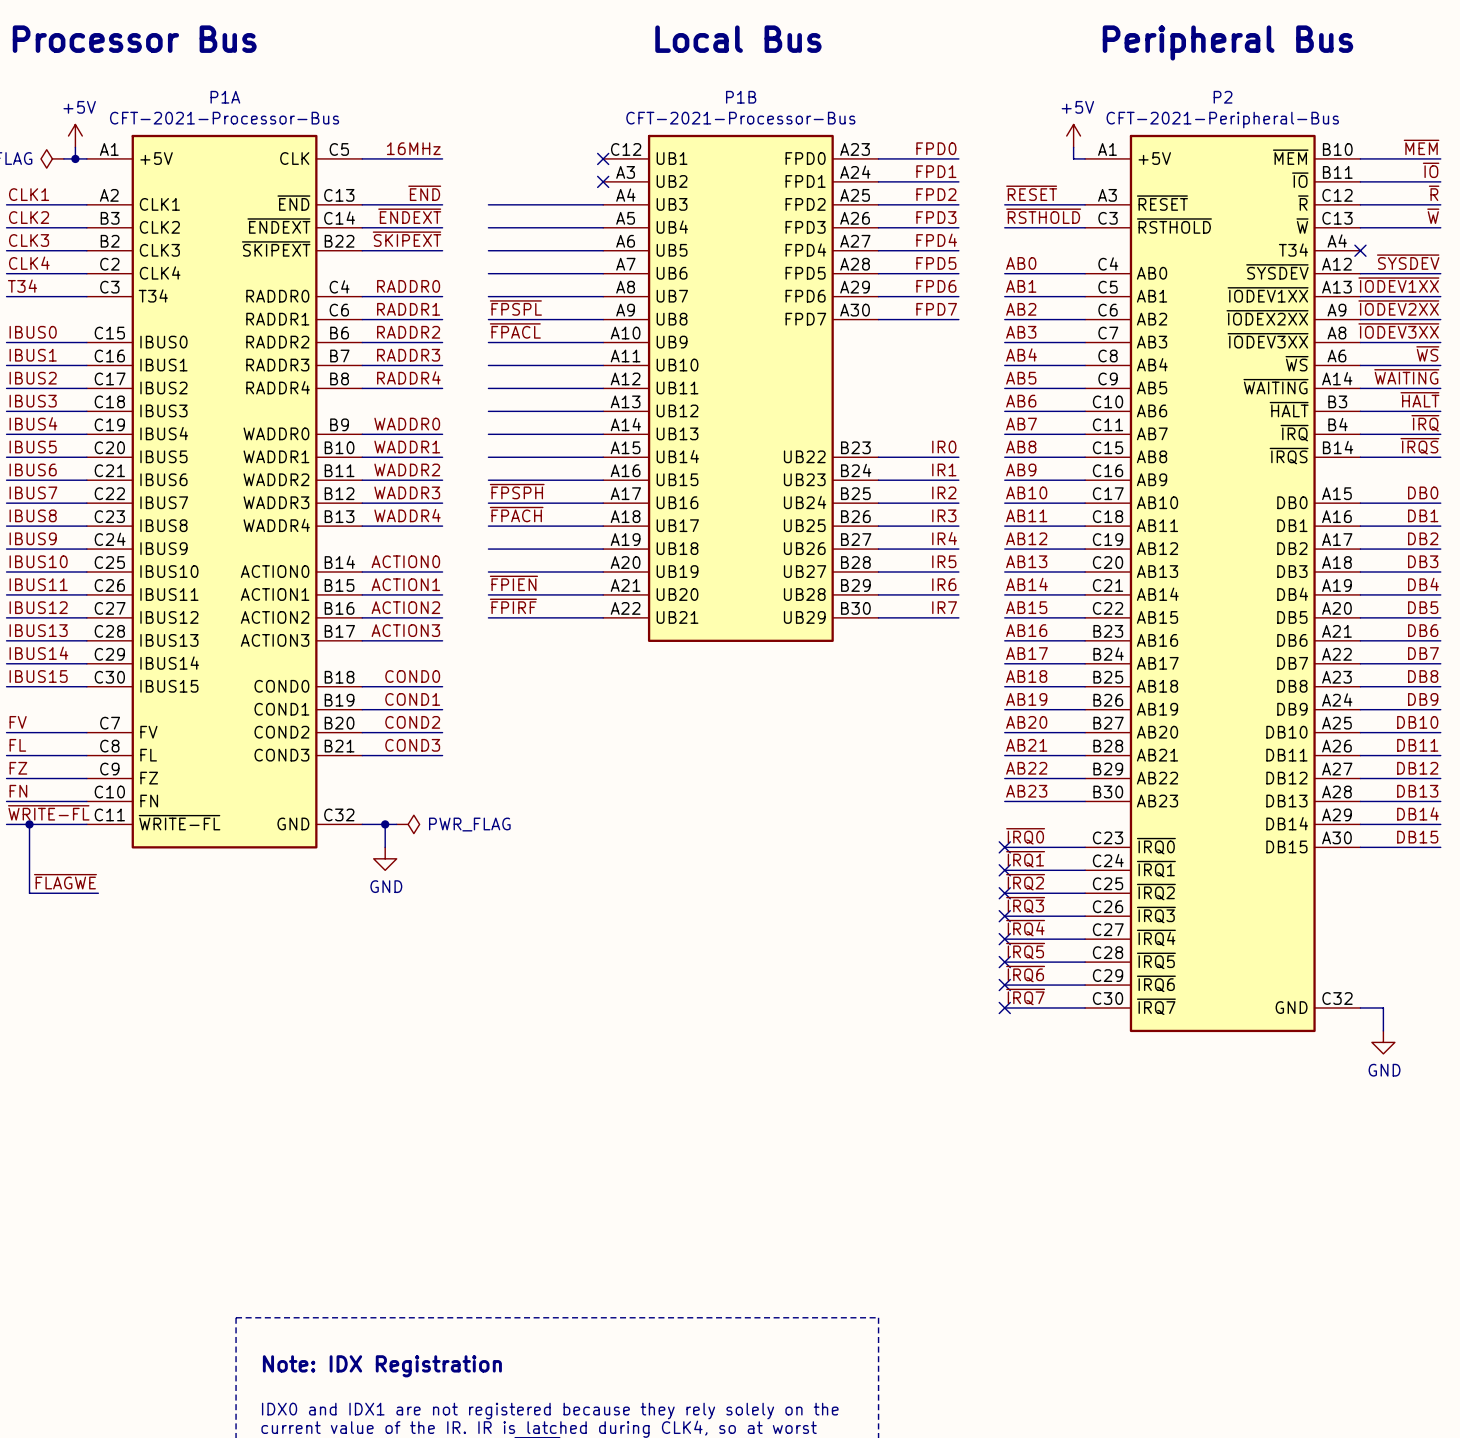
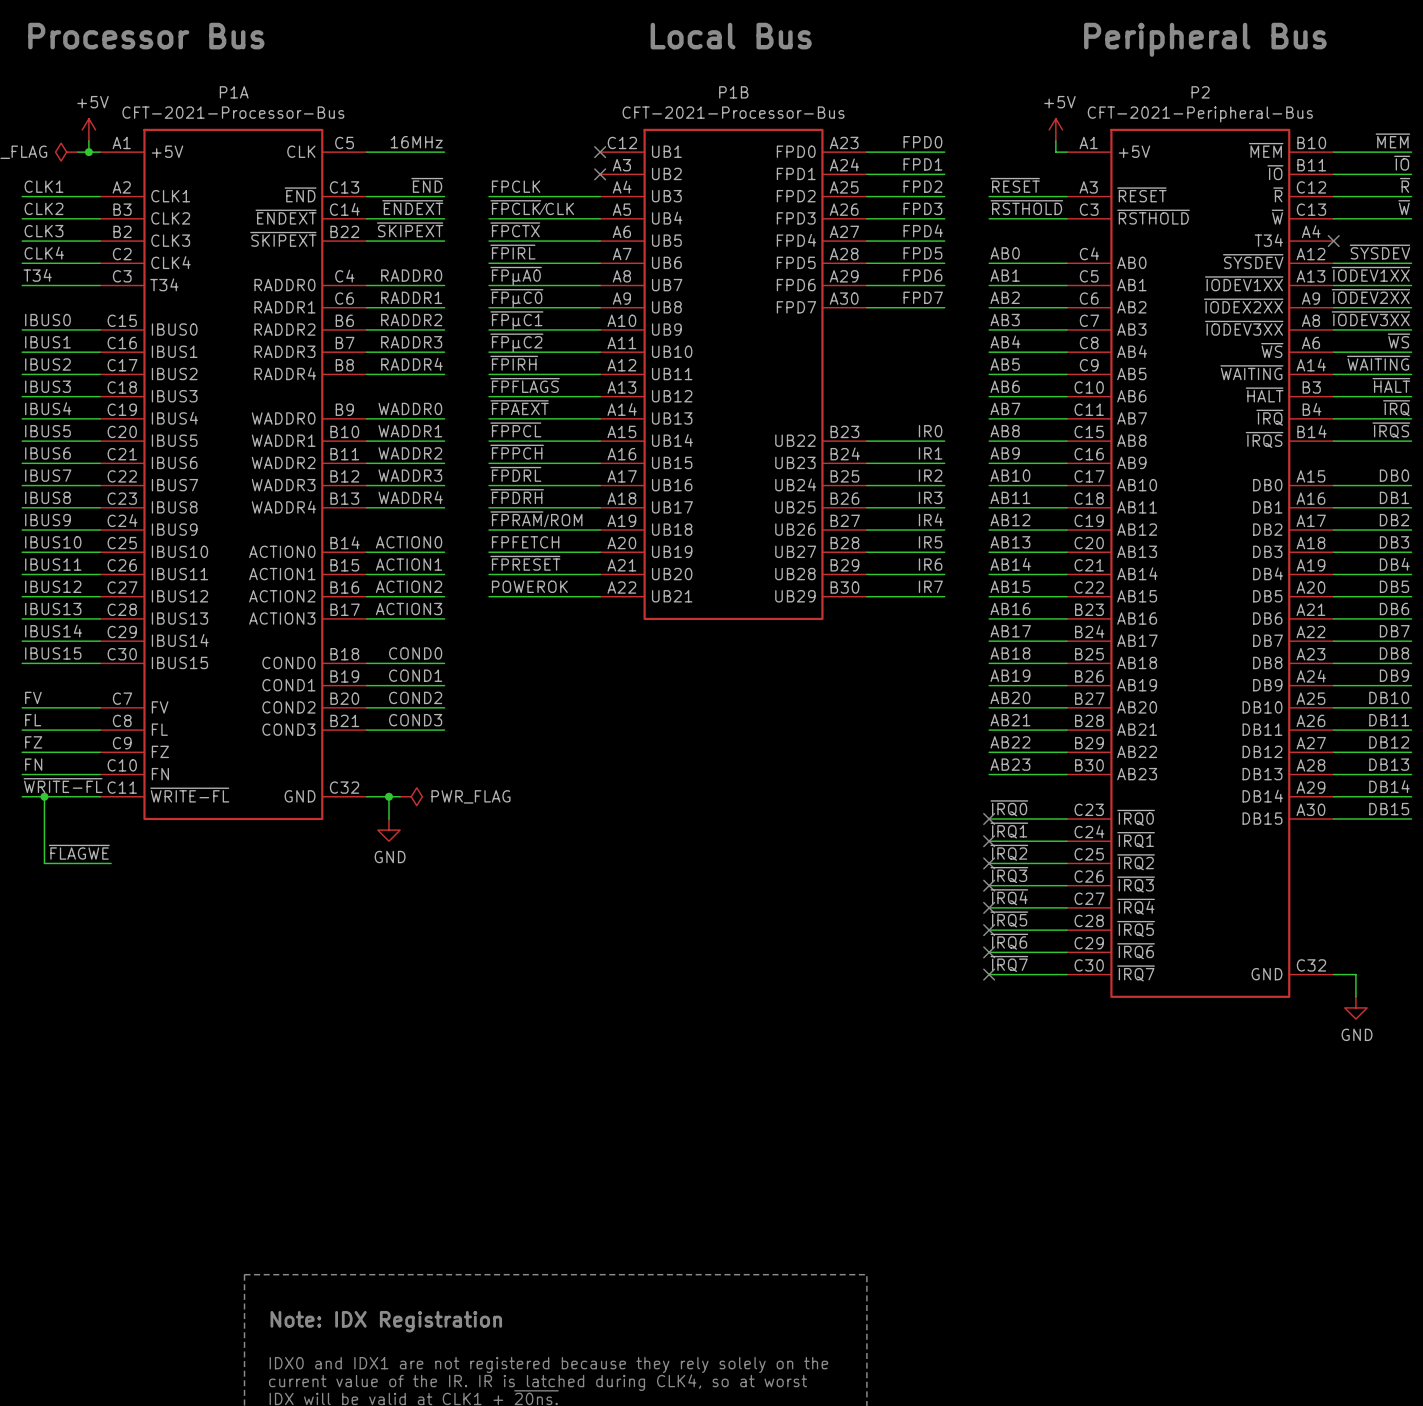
label: none -> FPCLK (516, 186)
label: none -> ~{FPCLK}⁄CLK (532, 207)
label: none -> ~{FPCTX} (515, 229)
label: none -> ~{FPIRL} (512, 252)
label: none -> ~{FPµA0} (516, 276)
label: ~{FPSPL} (515, 308) -> ~{FPµC0} (516, 298)
label: ~{FPACL} (515, 330) -> ~{FPµC1} (516, 320)
label: none -> ~{FPµC2} (516, 342)
label: none -> ~{FPIRH} (514, 363)
label: none -> ~{FPFLAGS} (525, 385)
label: none -> ~{FPAEXT} (519, 407)
label: none -> ~{FPPCL} (515, 429)
label: none -> ~{FPPCH} (517, 452)
label: ~{FPSPH} (517, 491) -> ~{FPDRL} (515, 474)
label: ~{FPACH} (516, 514) -> ~{FPDRH} (517, 496)
label: none -> ~{FPRAM}∕ROM (536, 519)
label: none -> FPFETCH (525, 542)
label: ~{FPIEN} (513, 583) -> ~{FPRESET} (525, 563)
label: ~{FPIRF} (513, 606) -> POWEROK (529, 586)

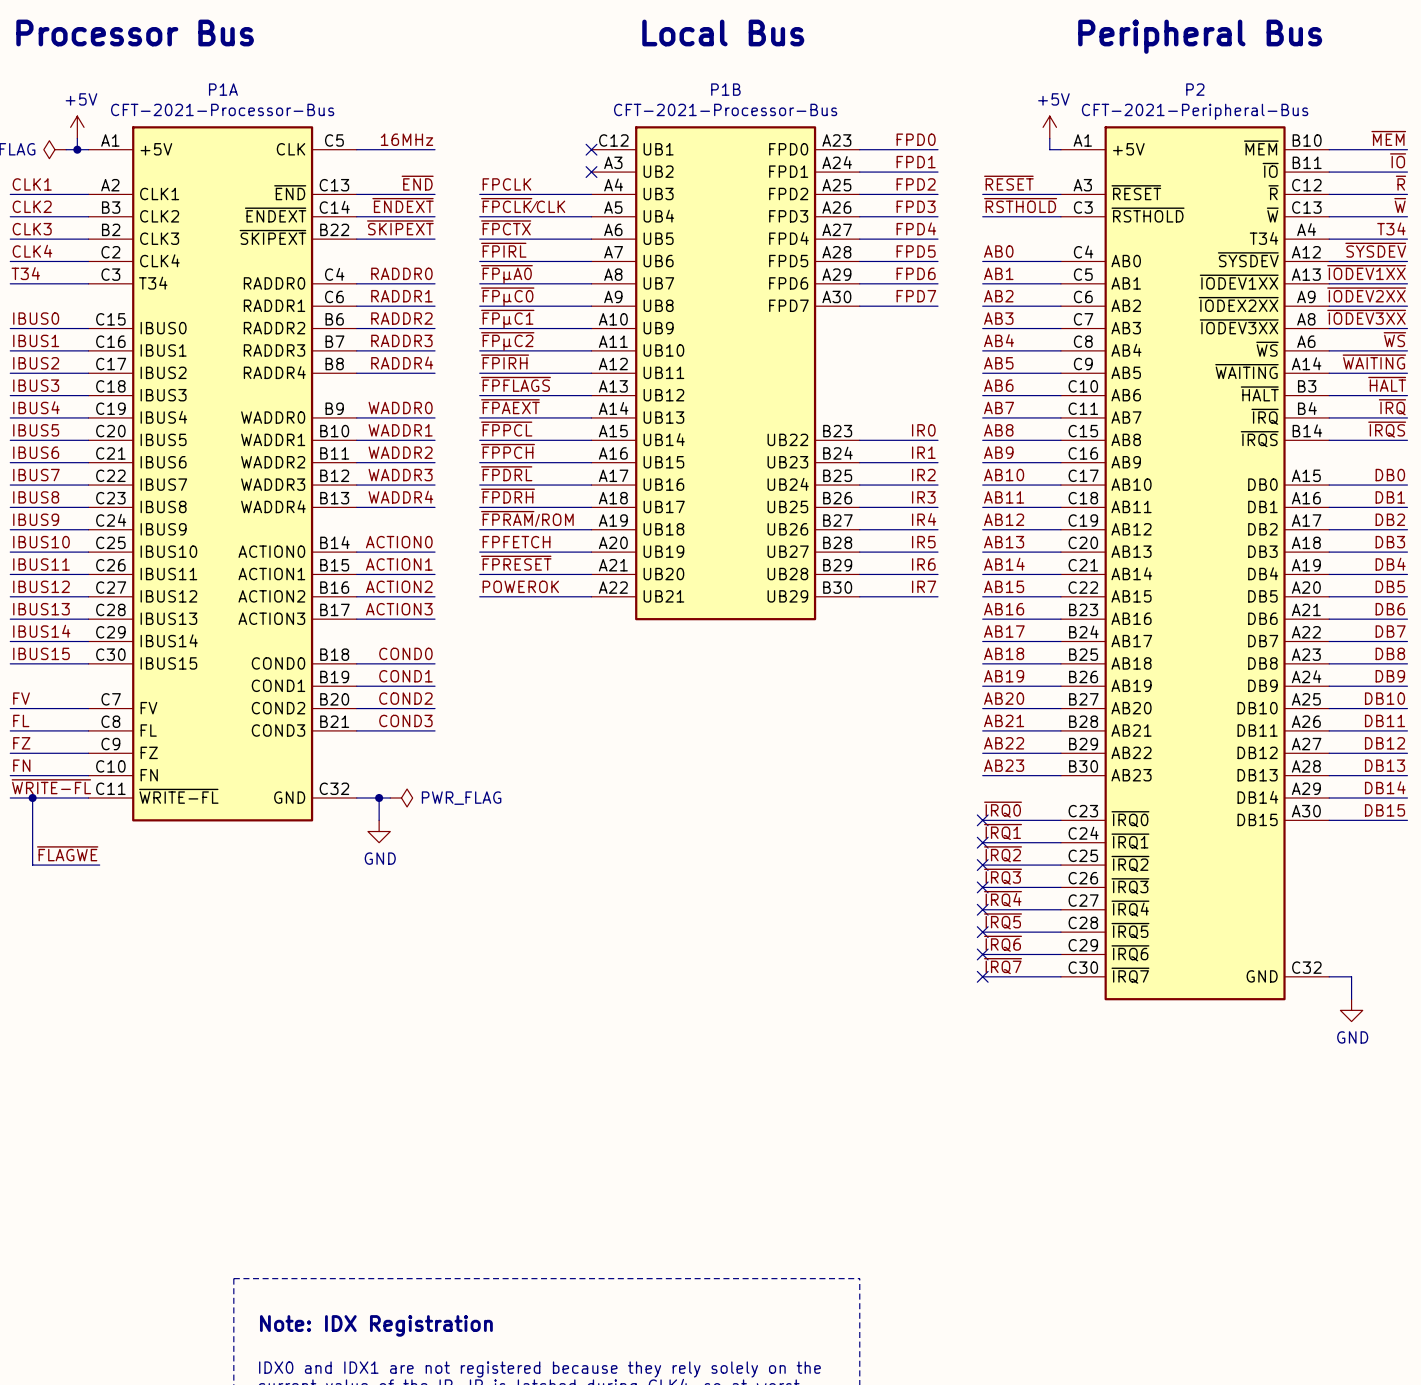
label: none -> T34 (1391, 228)
wire: none -> (1329, 239) (1407, 239)
no-connect mark: (1333, 241) -> none

